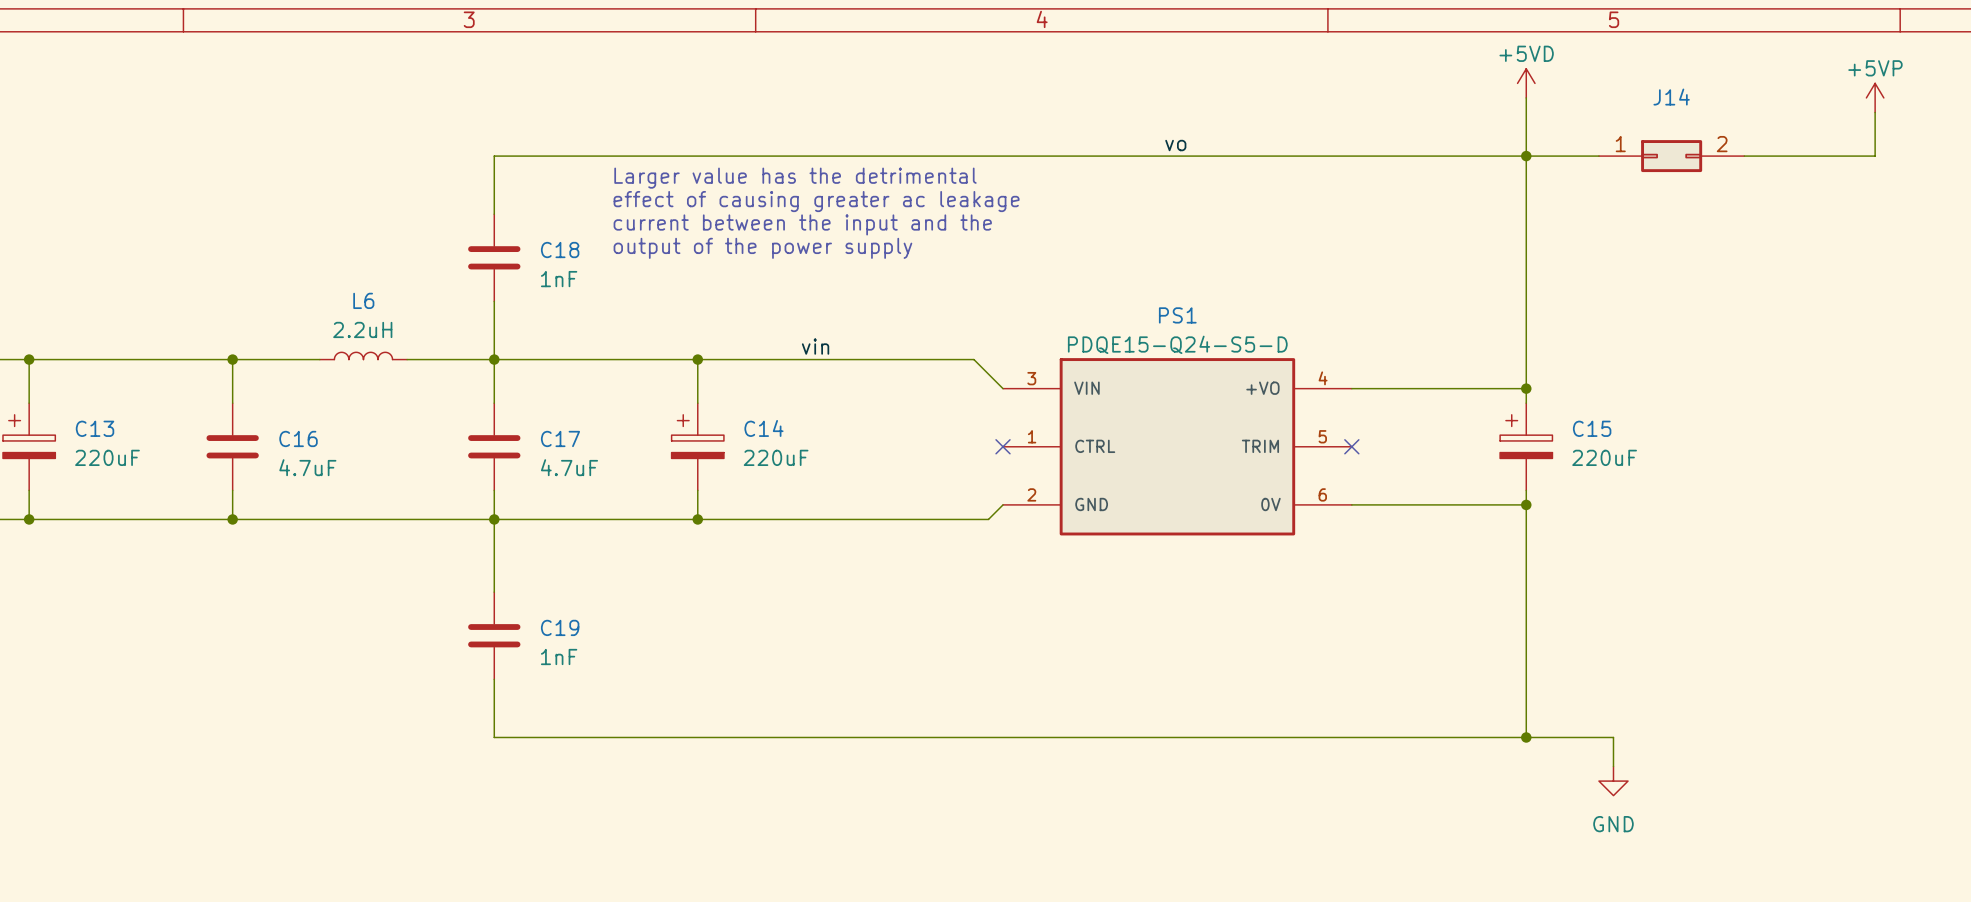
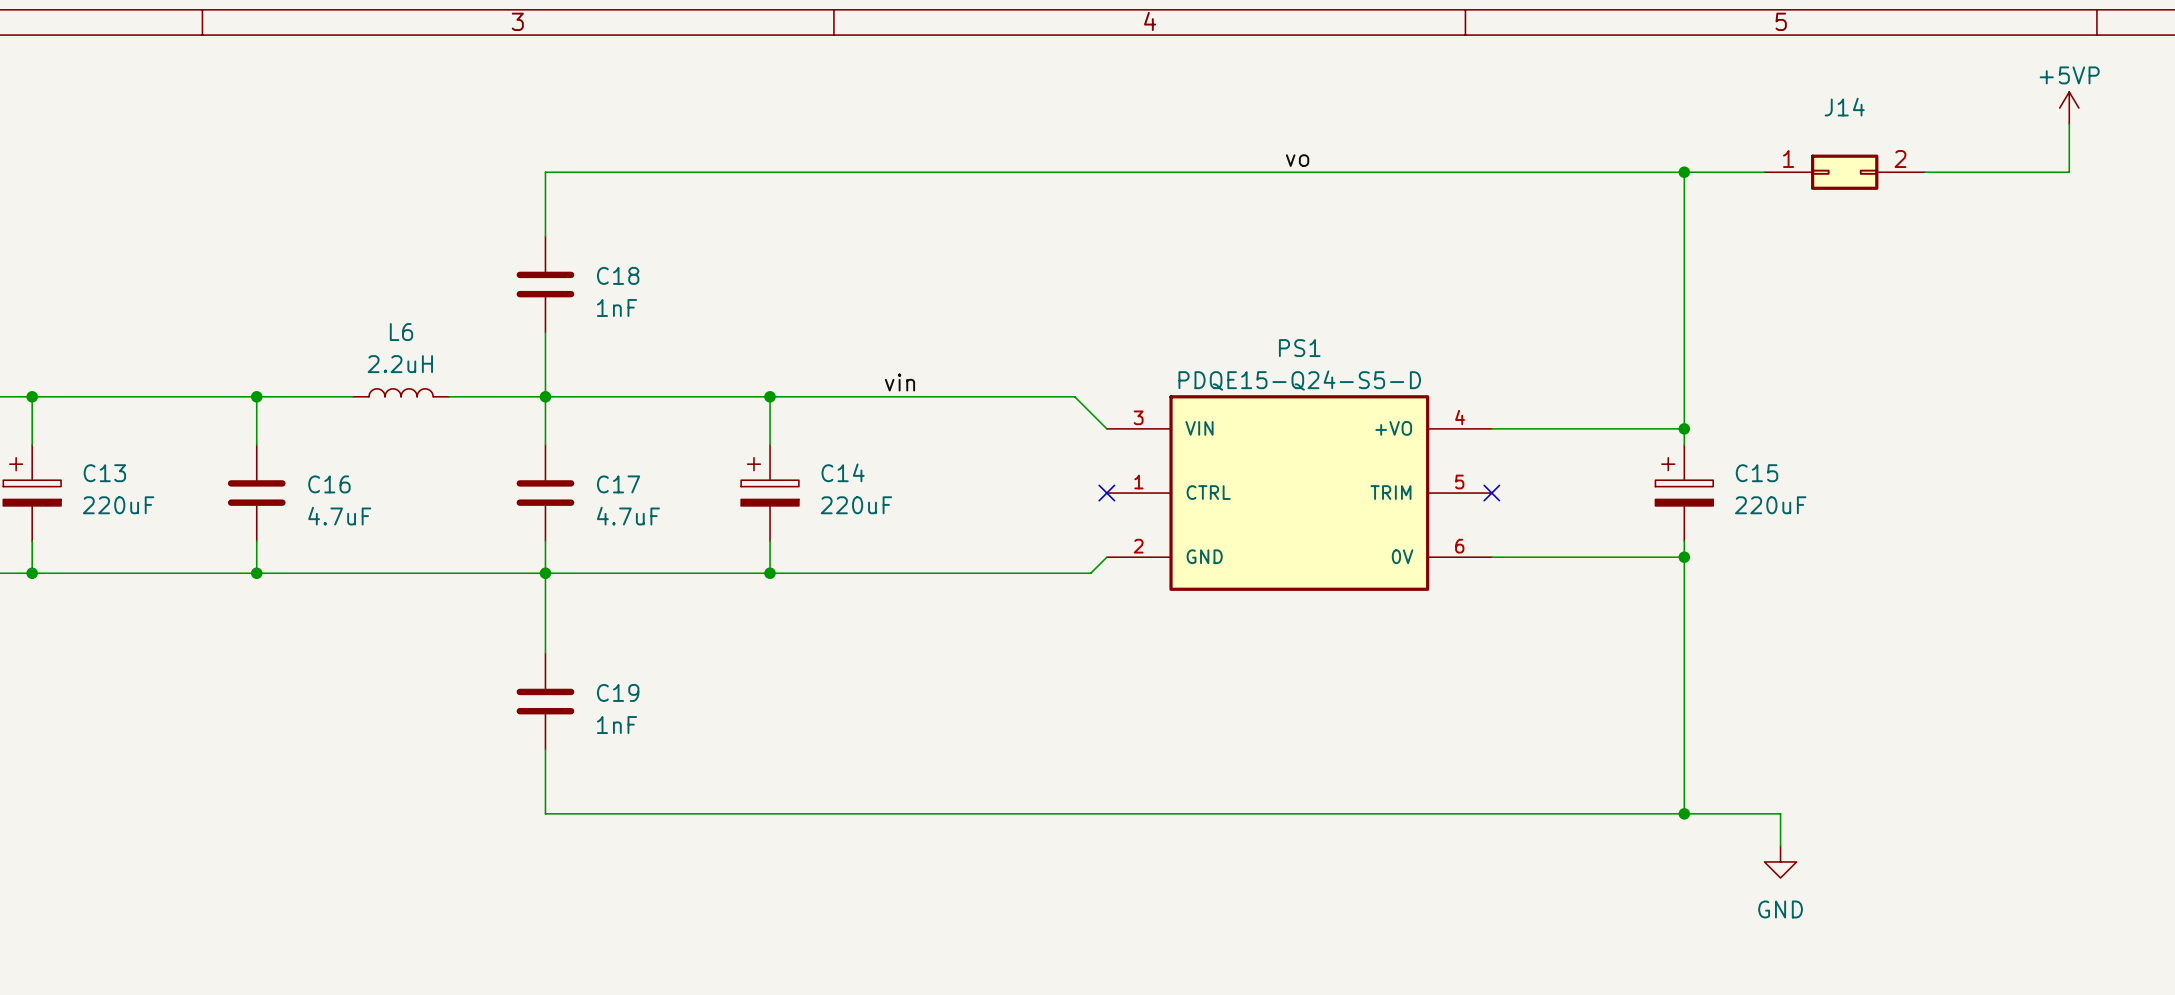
power symbol: +5VD (1526, 83) -> none
wire: (1526, 97) (1526, 156) -> none
text: Larger value has the detrimental (795, 178) -> none
text: effect of causing greater ac leakage (816, 201) -> none
text: current between the input and the (802, 224) -> none
text: output of the power supply (762, 248) -> none

